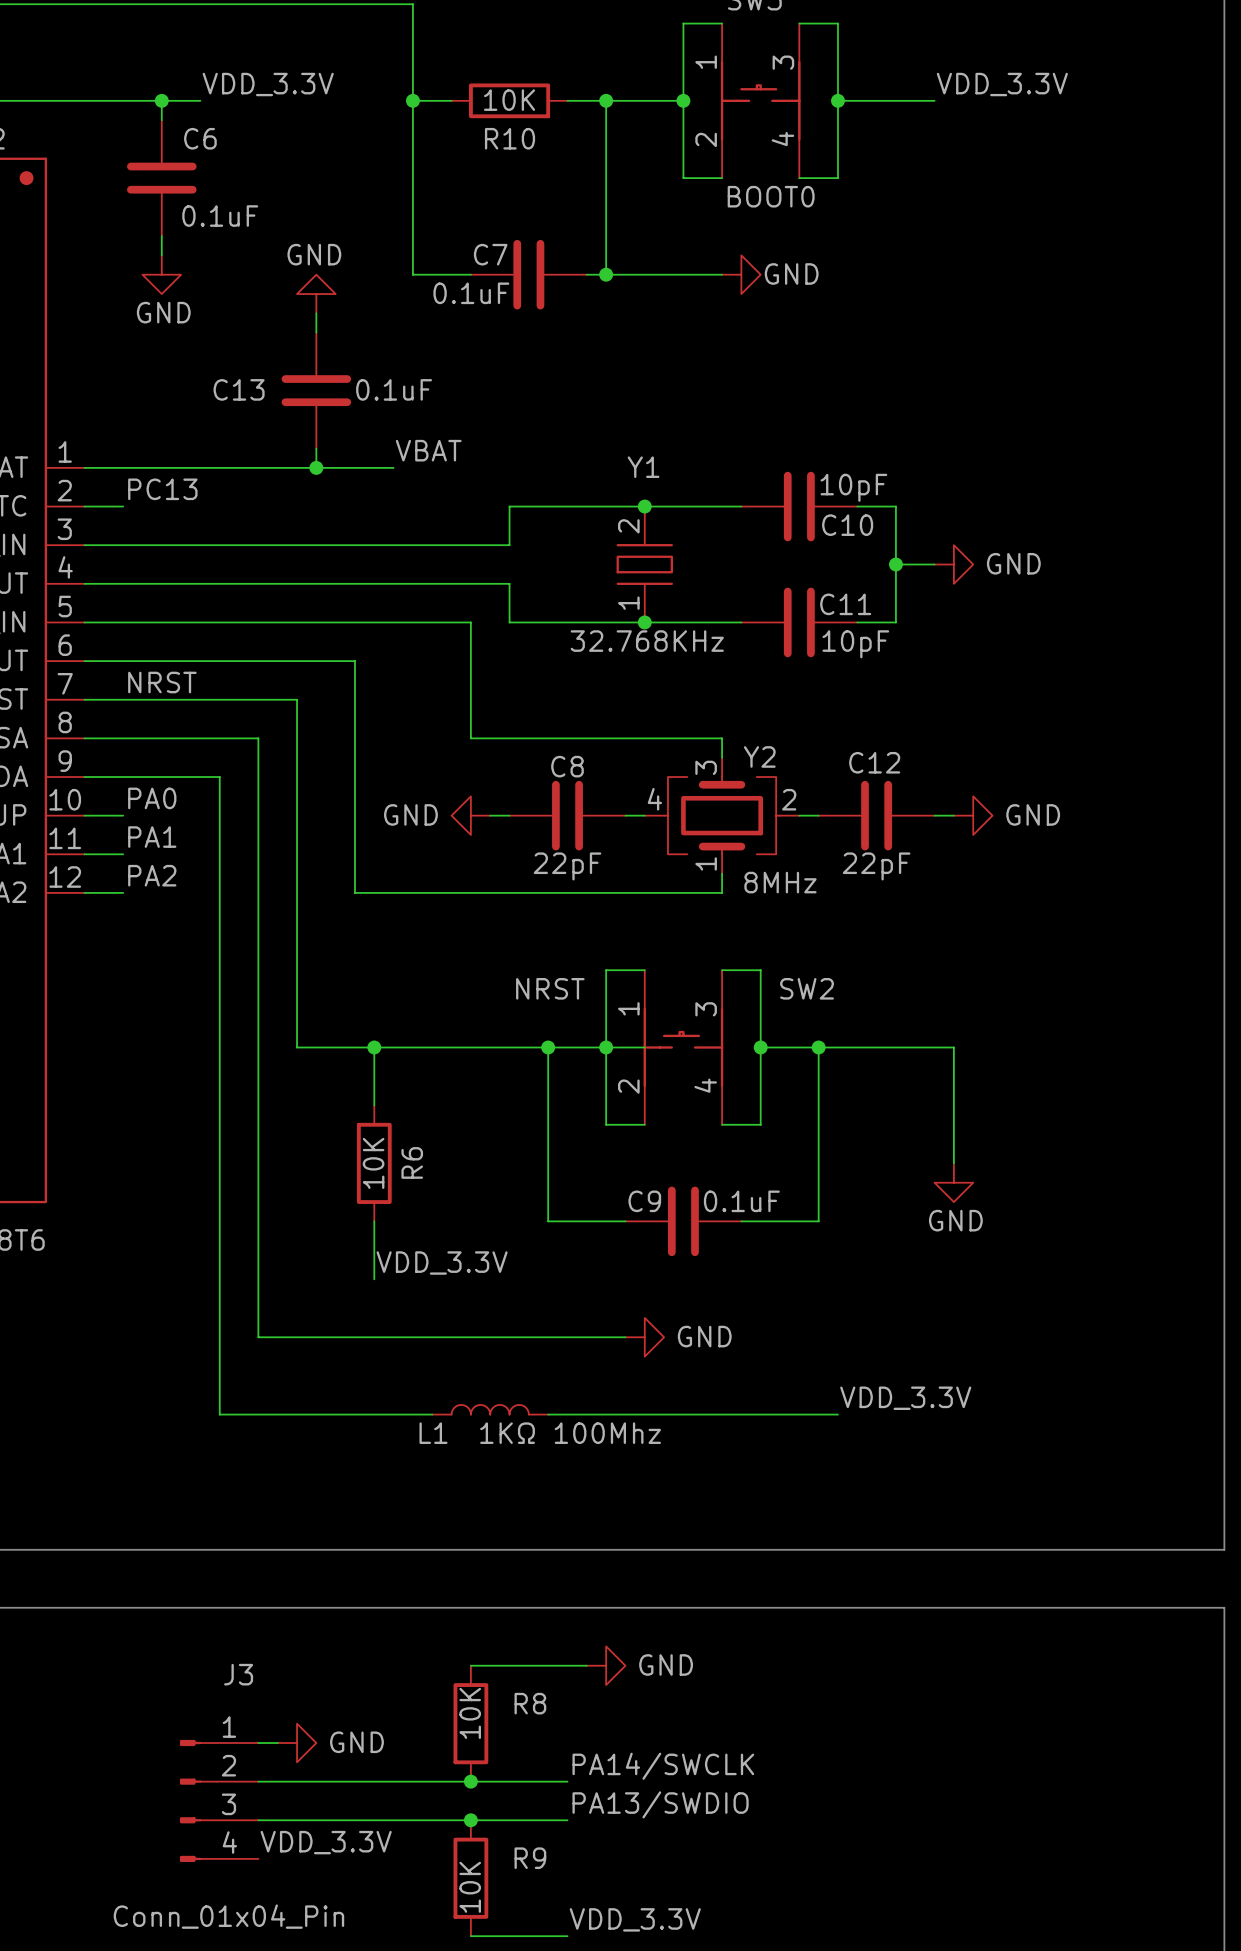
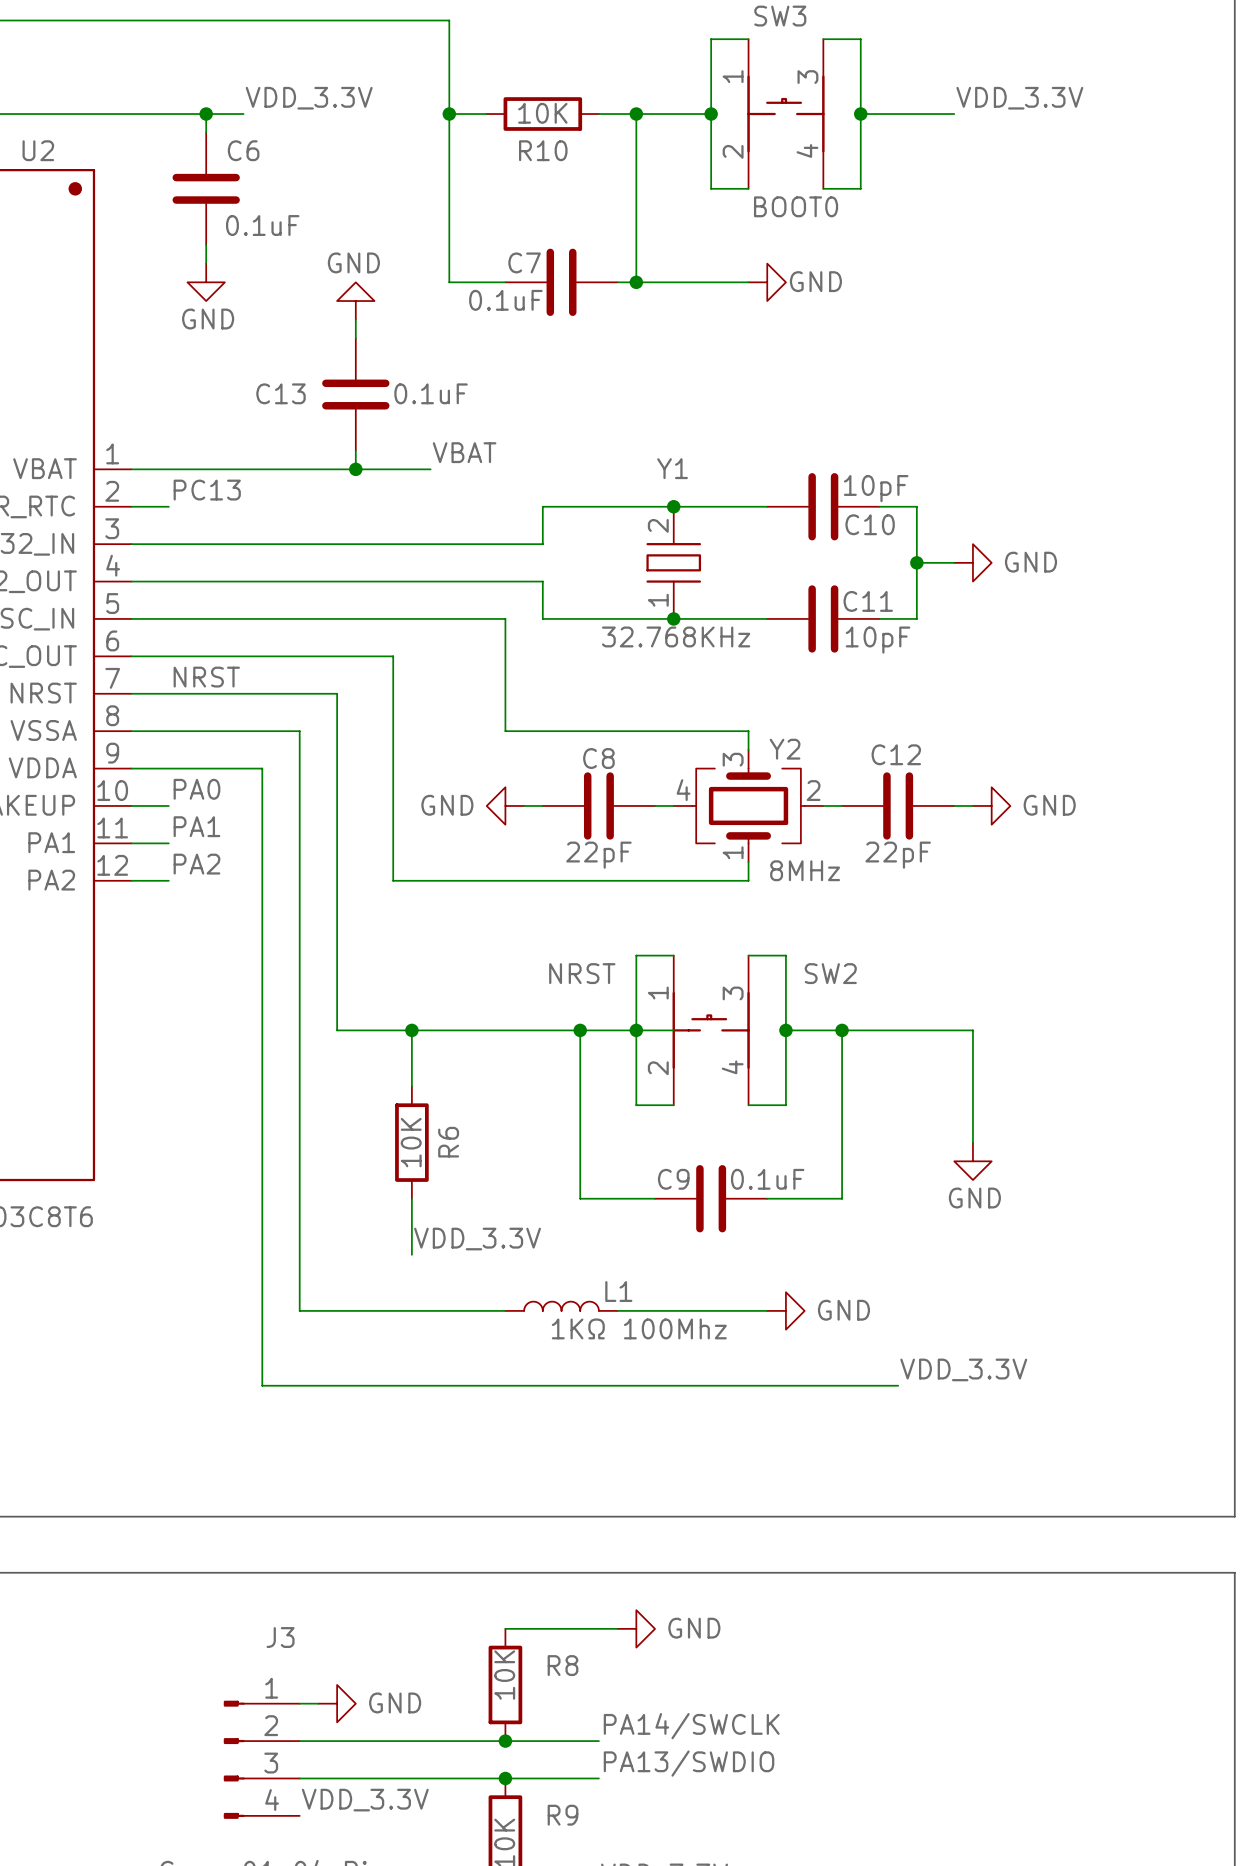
wire: (470, 1337) (586, 1337) -> (468, 1385) (580, 1385)
wire: none -> (655, 1310) (767, 1310)
power symbol position: GND (644, 1337) -> GND (785, 1310)
label position: VDD_3.3V (905, 1398) -> VDD_3.3V (963, 1369)
L1 position: (490, 1409) -> (561, 1306)
wire: none -> (860, 1385) (898, 1385)
L1 name position: L1 (433, 1433) -> L1 (618, 1291)

